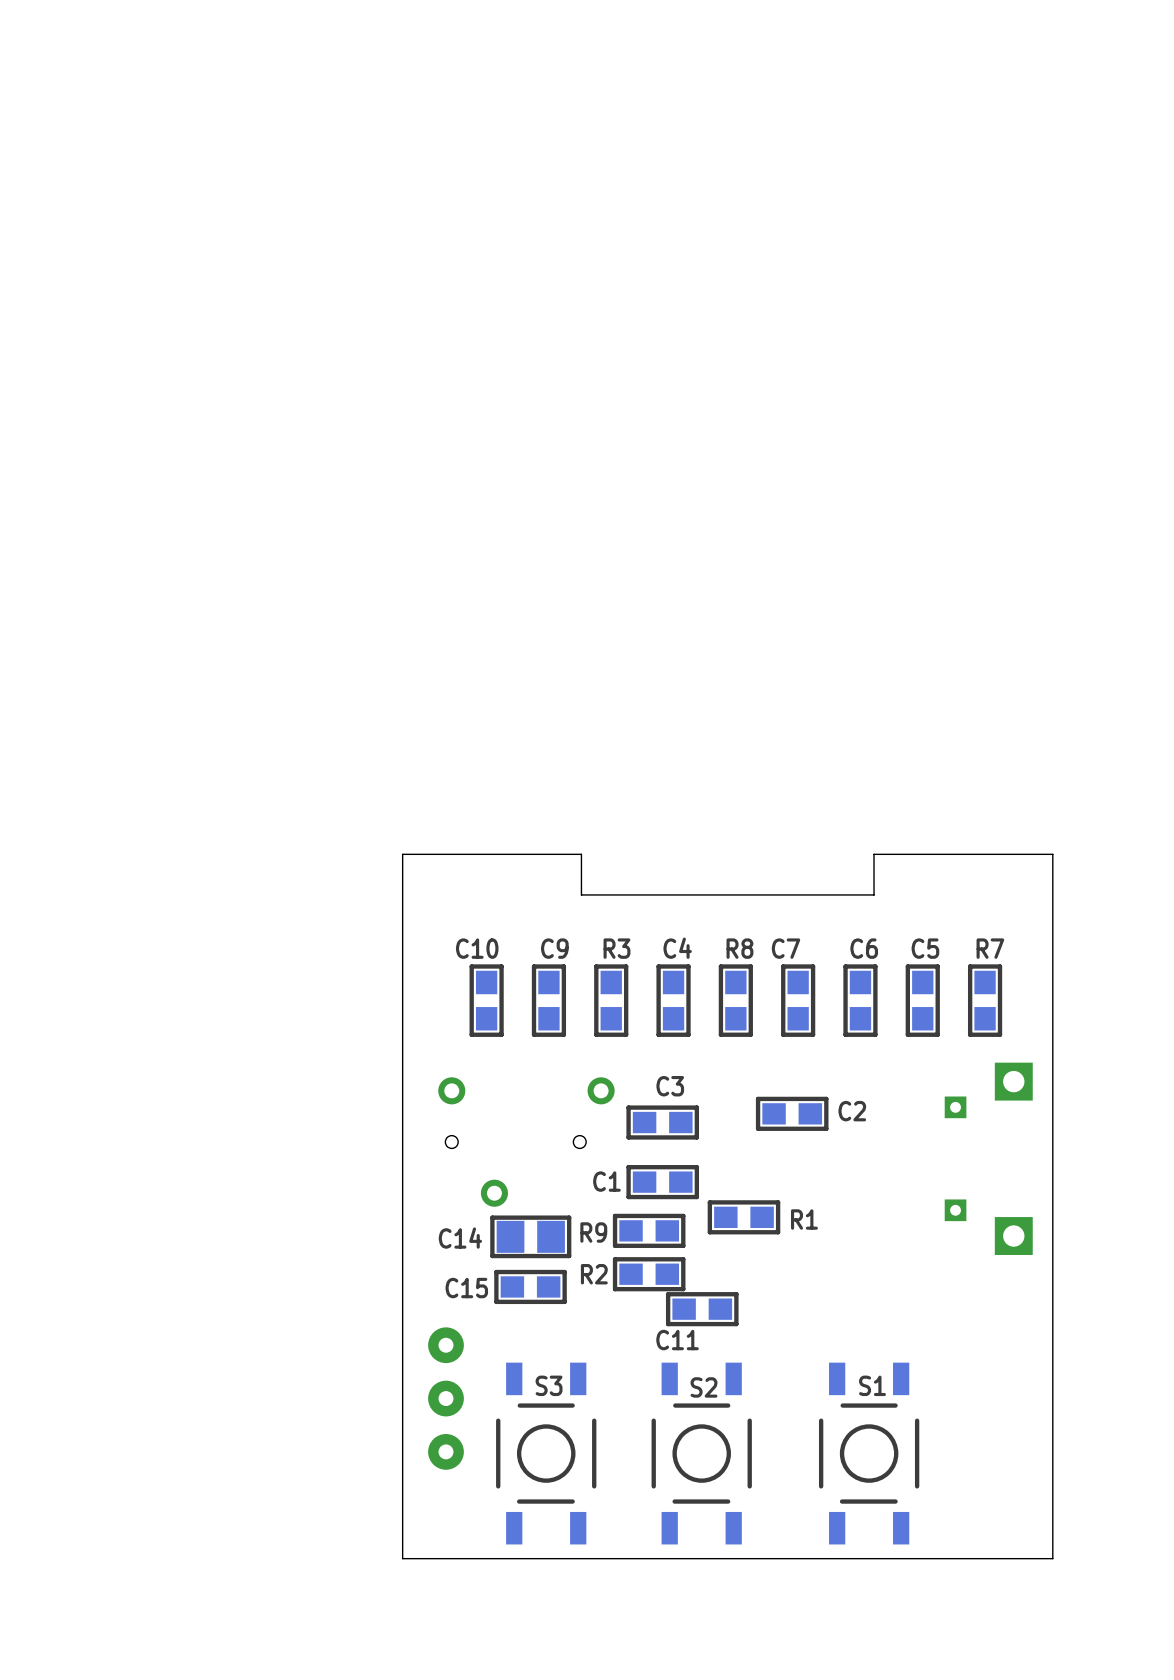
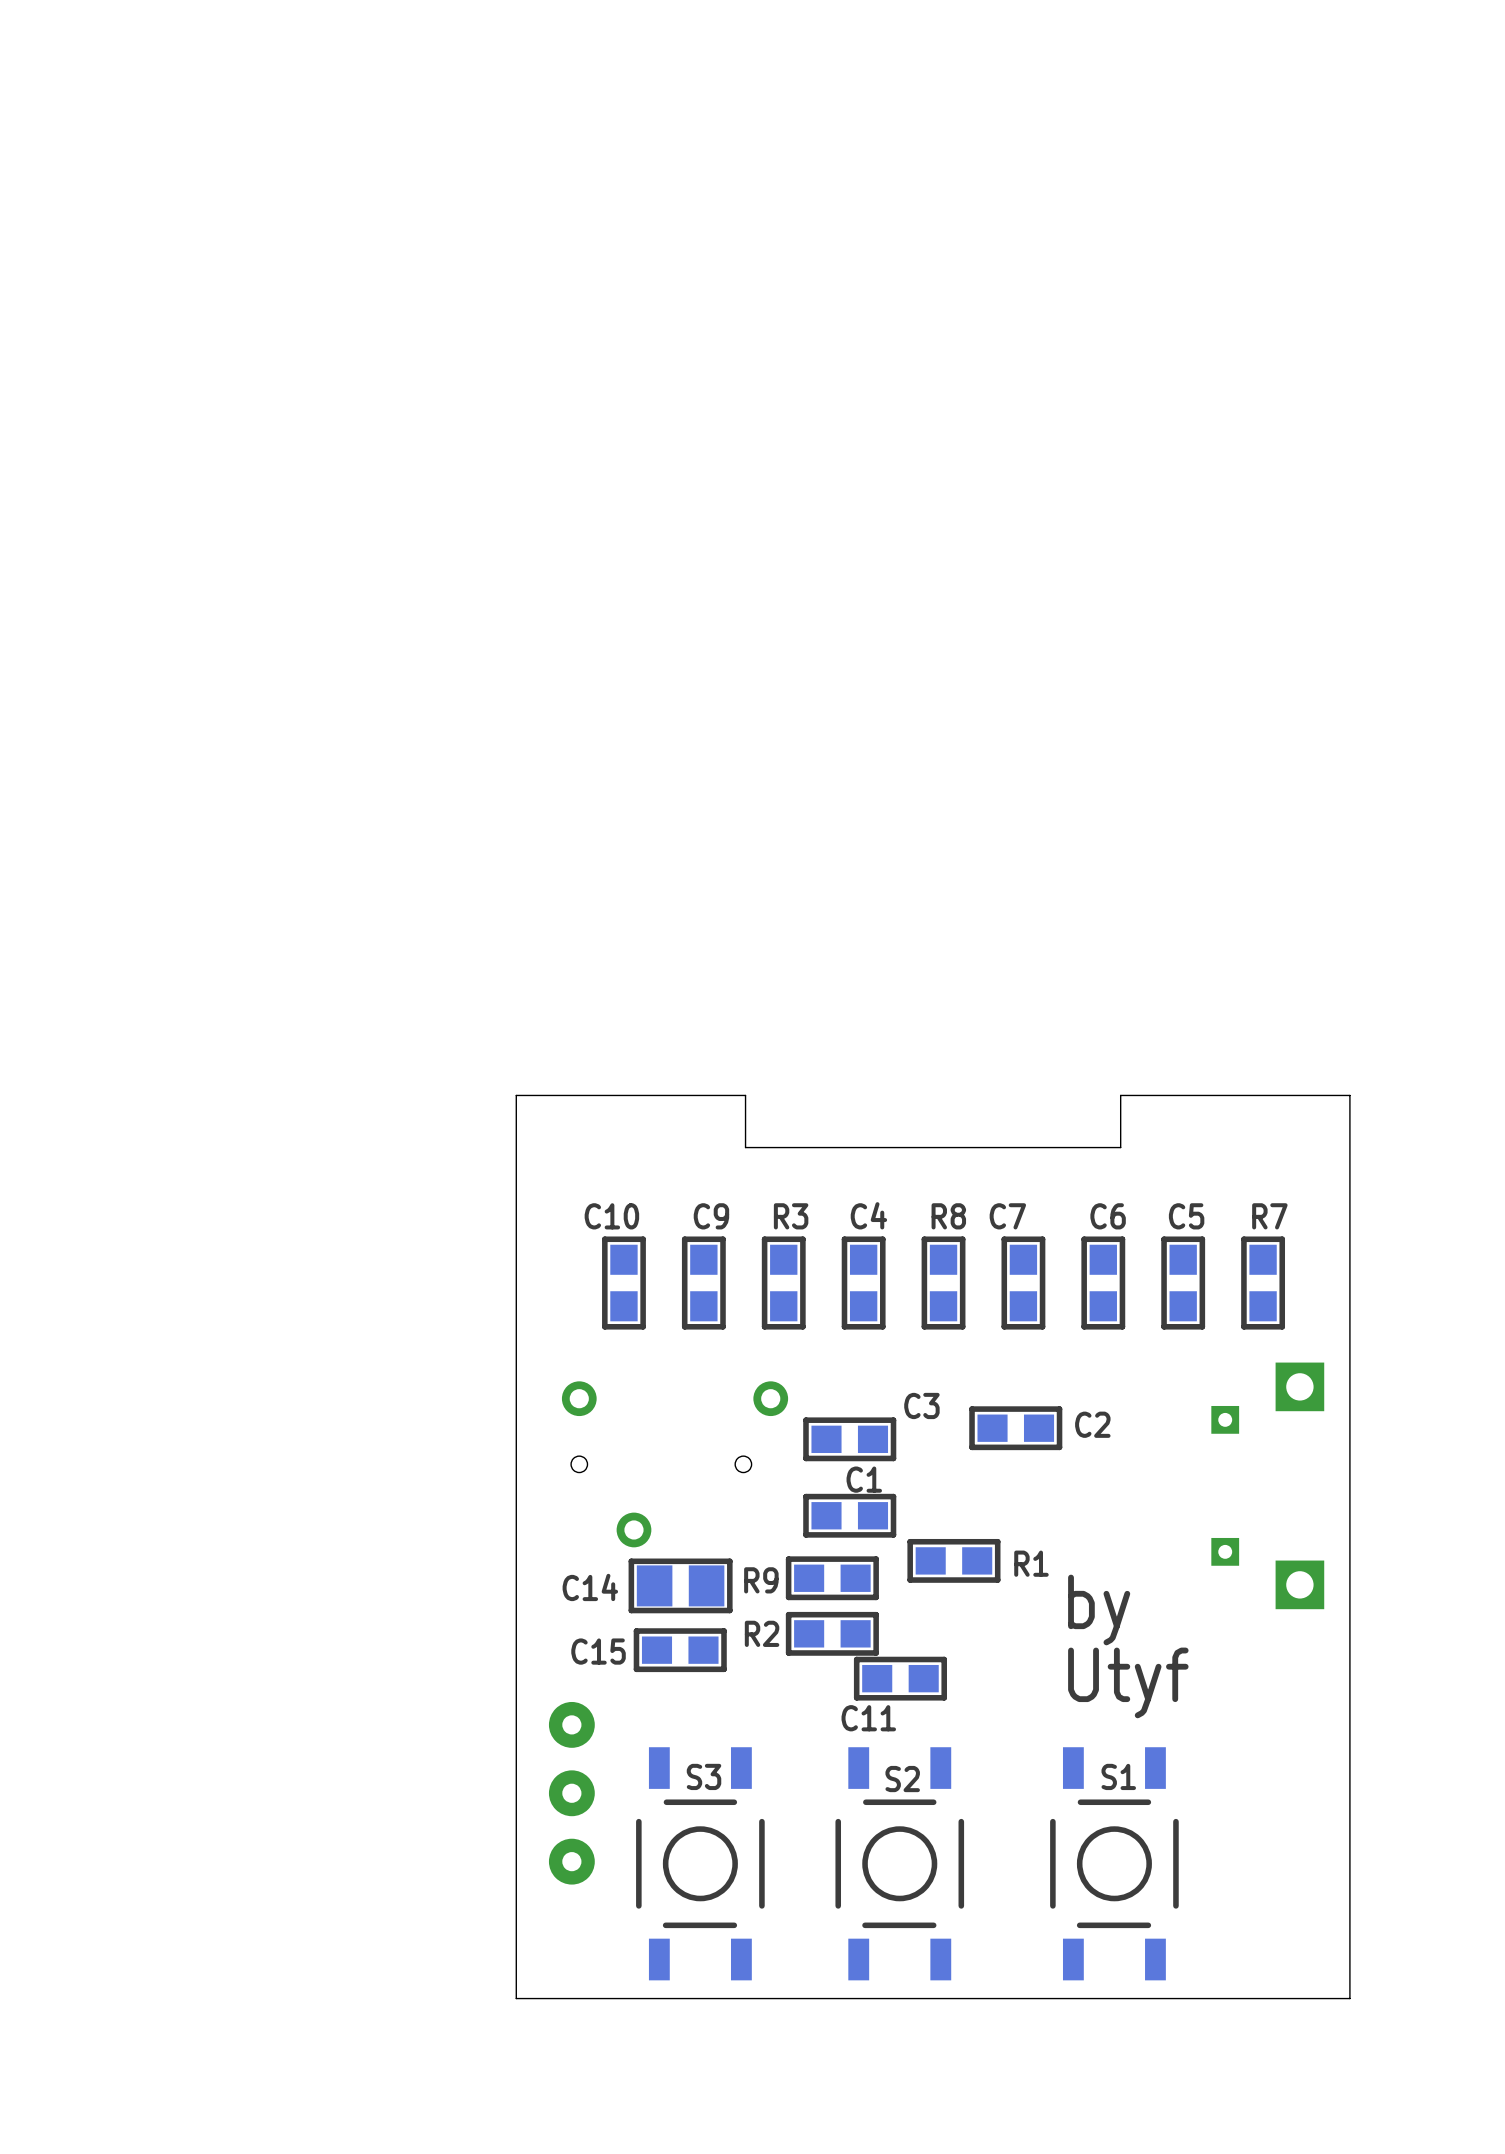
C3 name position: C3 (670, 1086) -> C3 (921, 1405)
C1 name position: C1 (606, 1181) -> C1 (864, 1479)
text: none -> by (1099, 1609)
text: none -> Utyf (1128, 1682)

